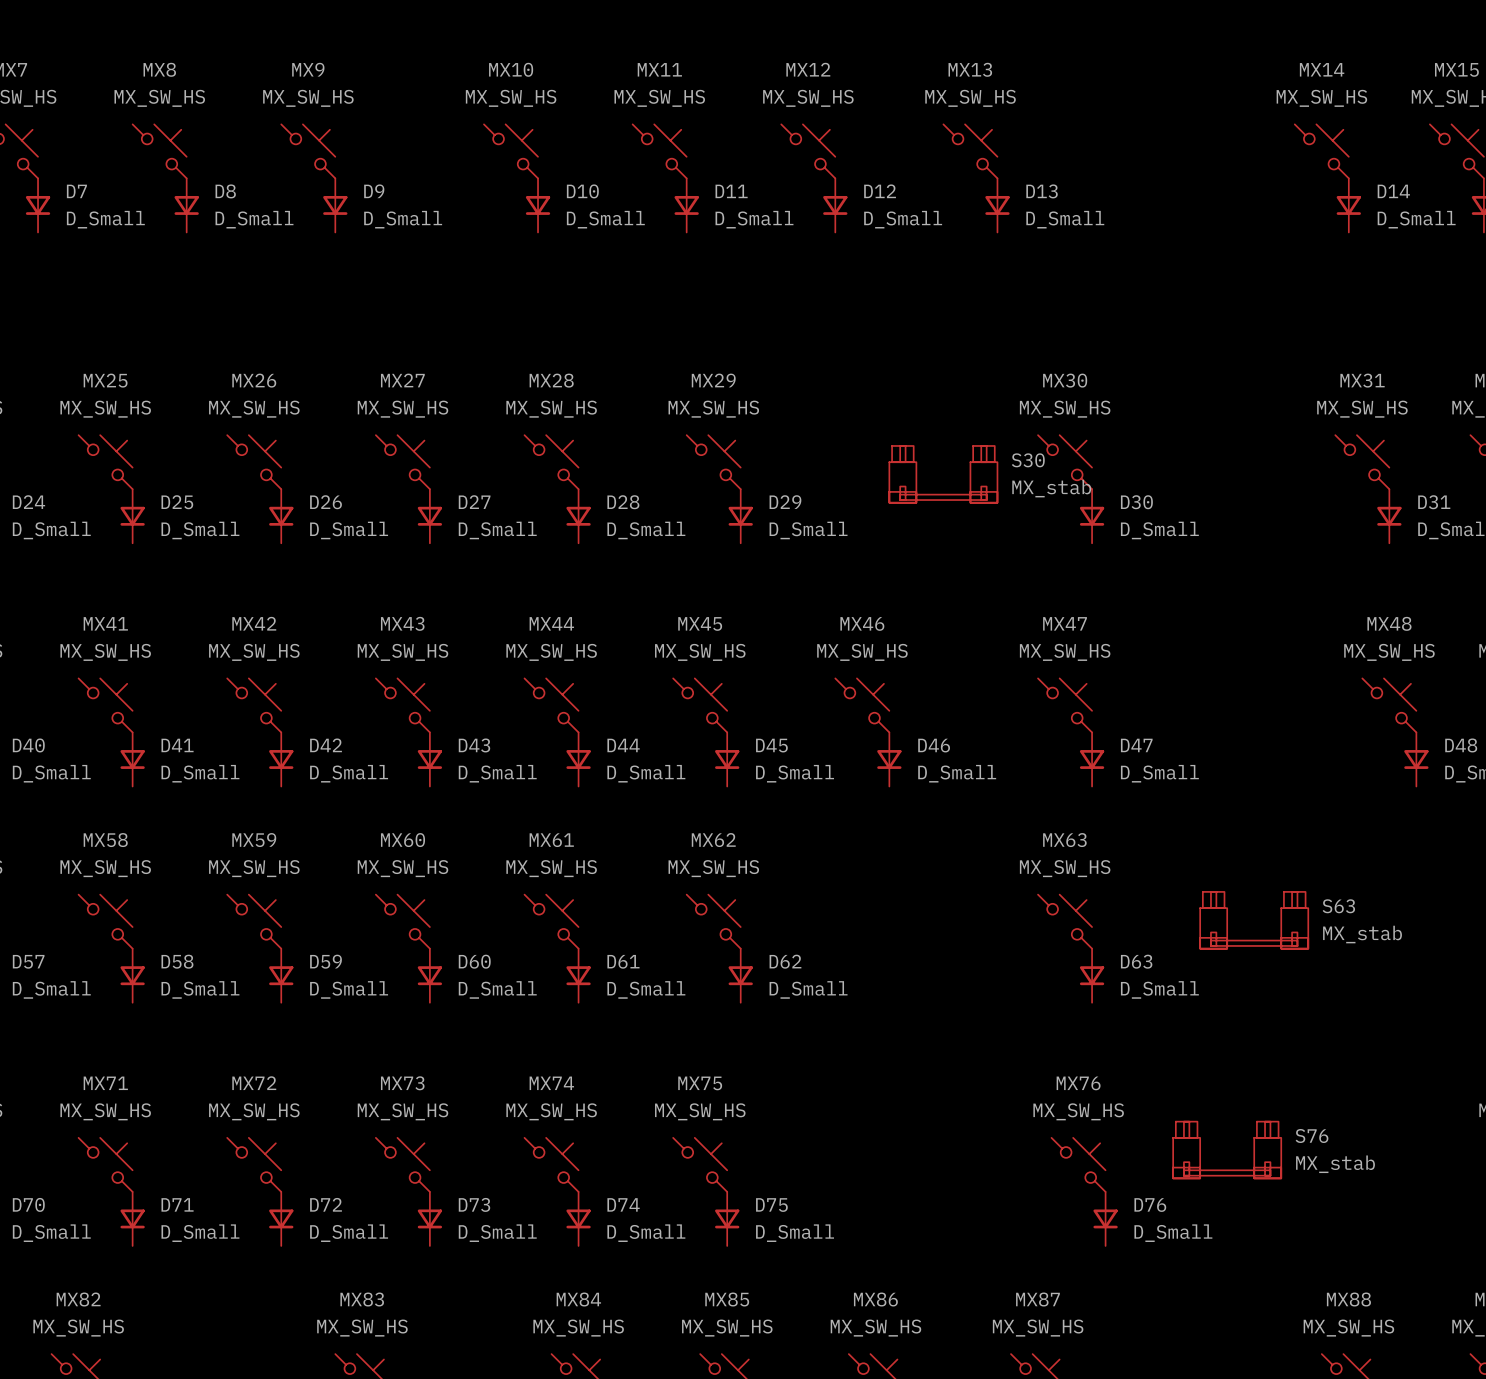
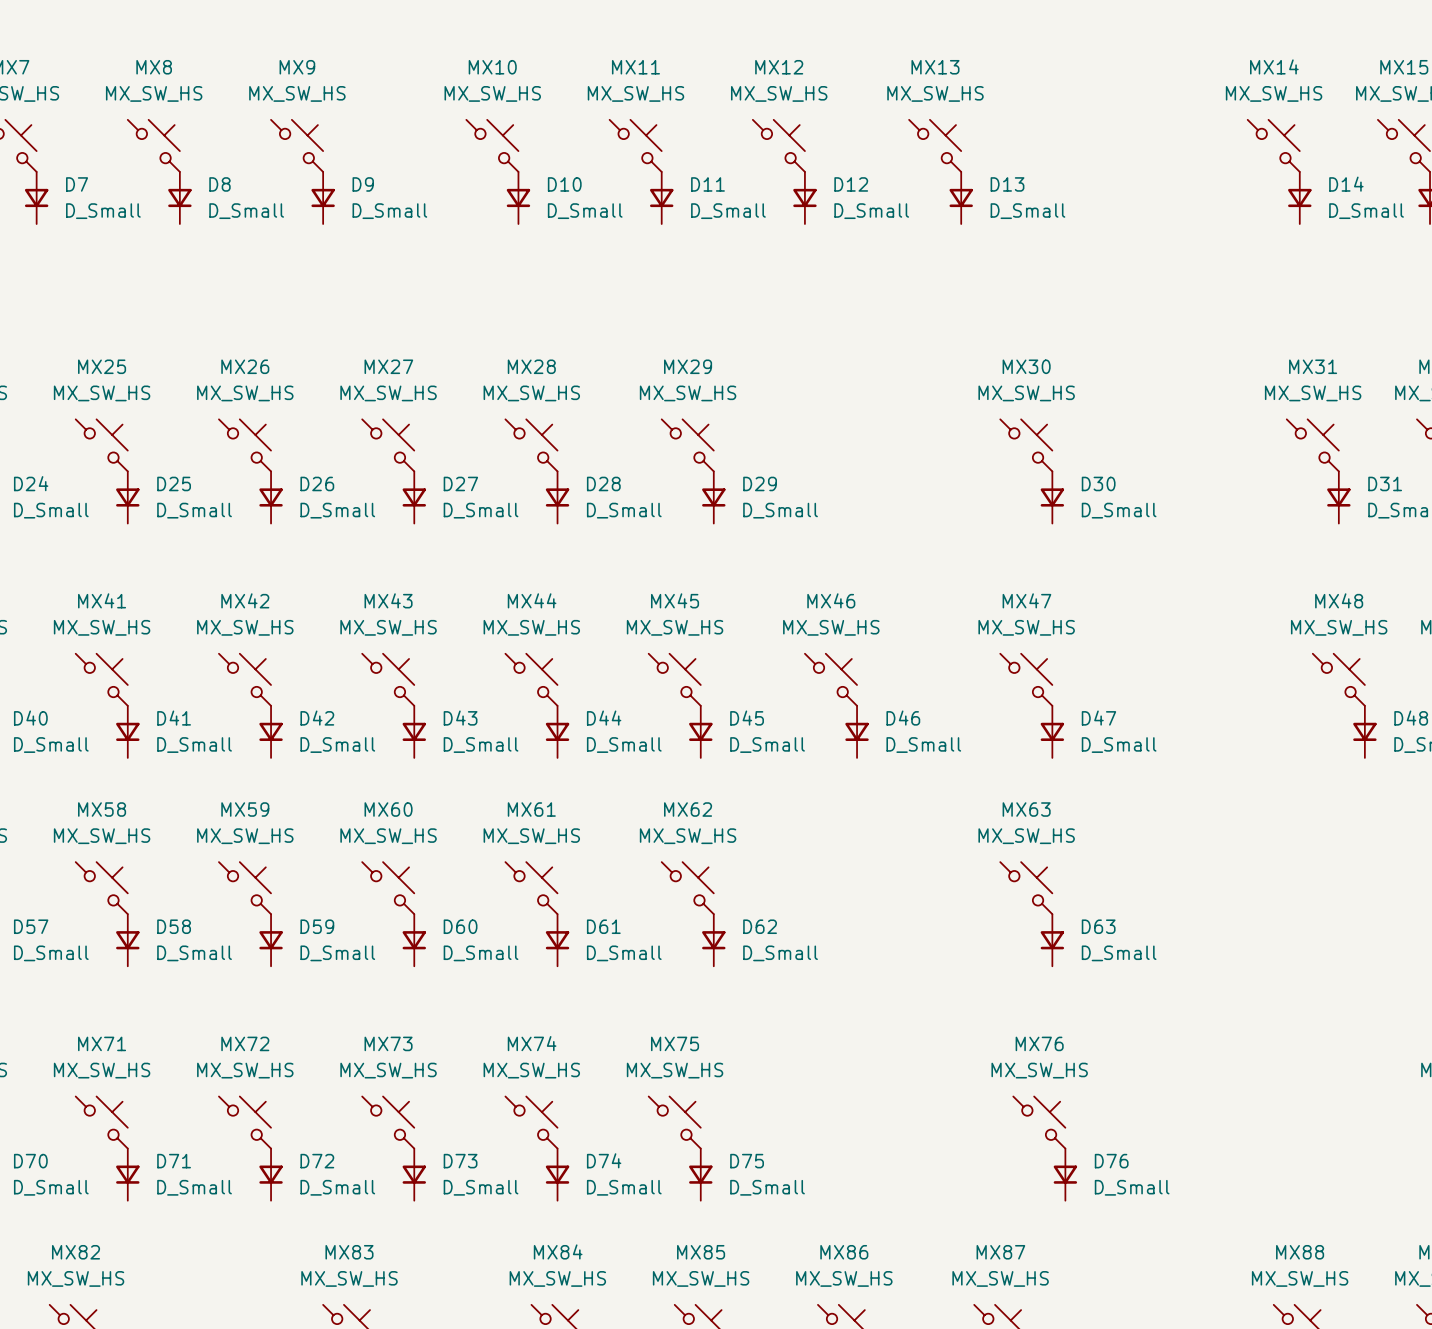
S30: MX_stab (943, 474) -> none
S63: MX_stab (1254, 920) -> none
S76: MX_stab (1227, 1150) -> none

